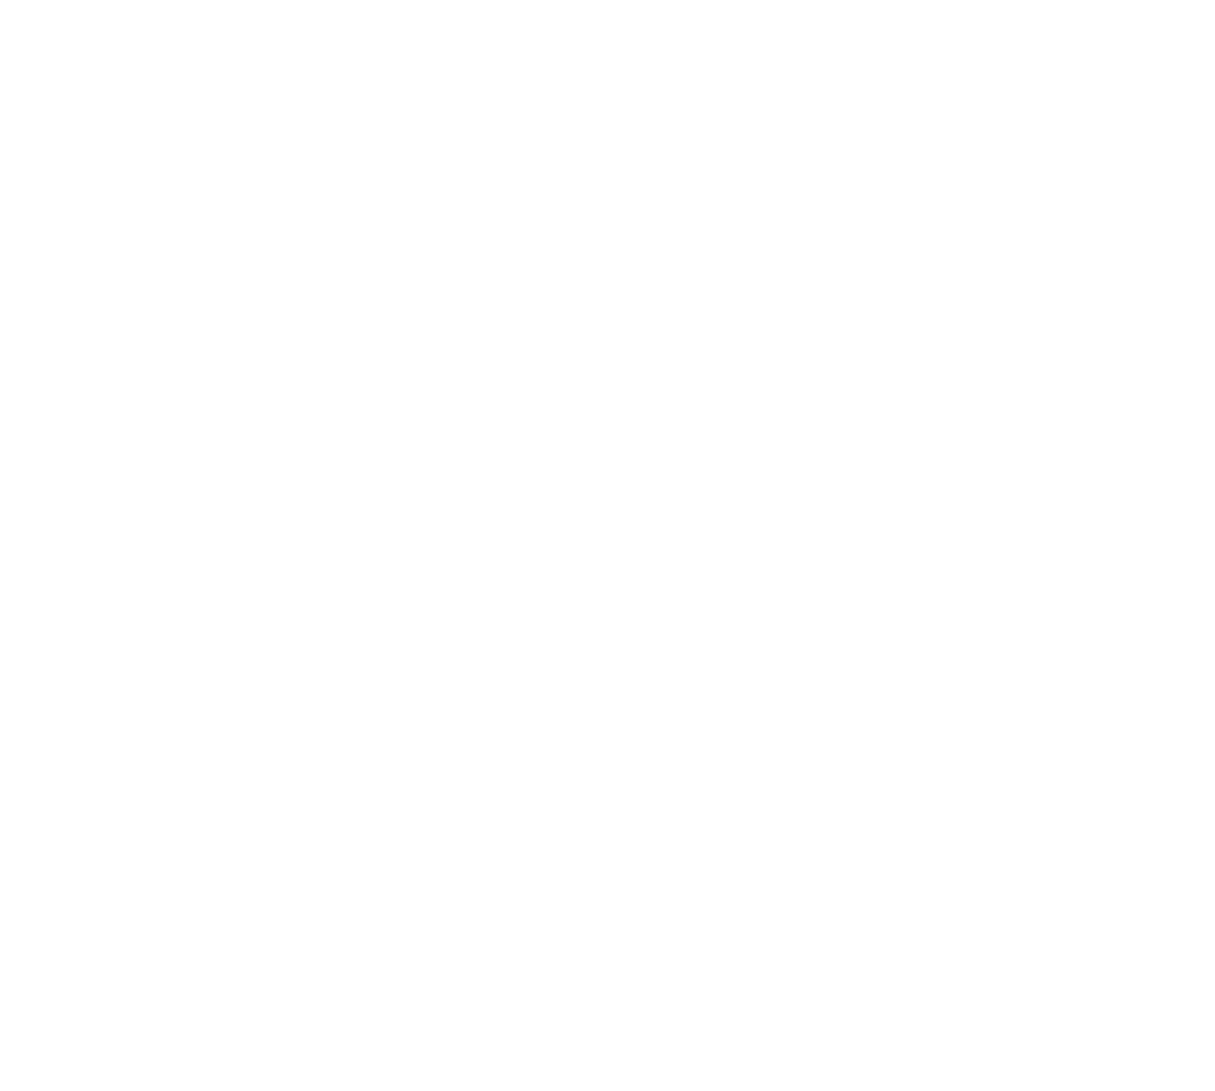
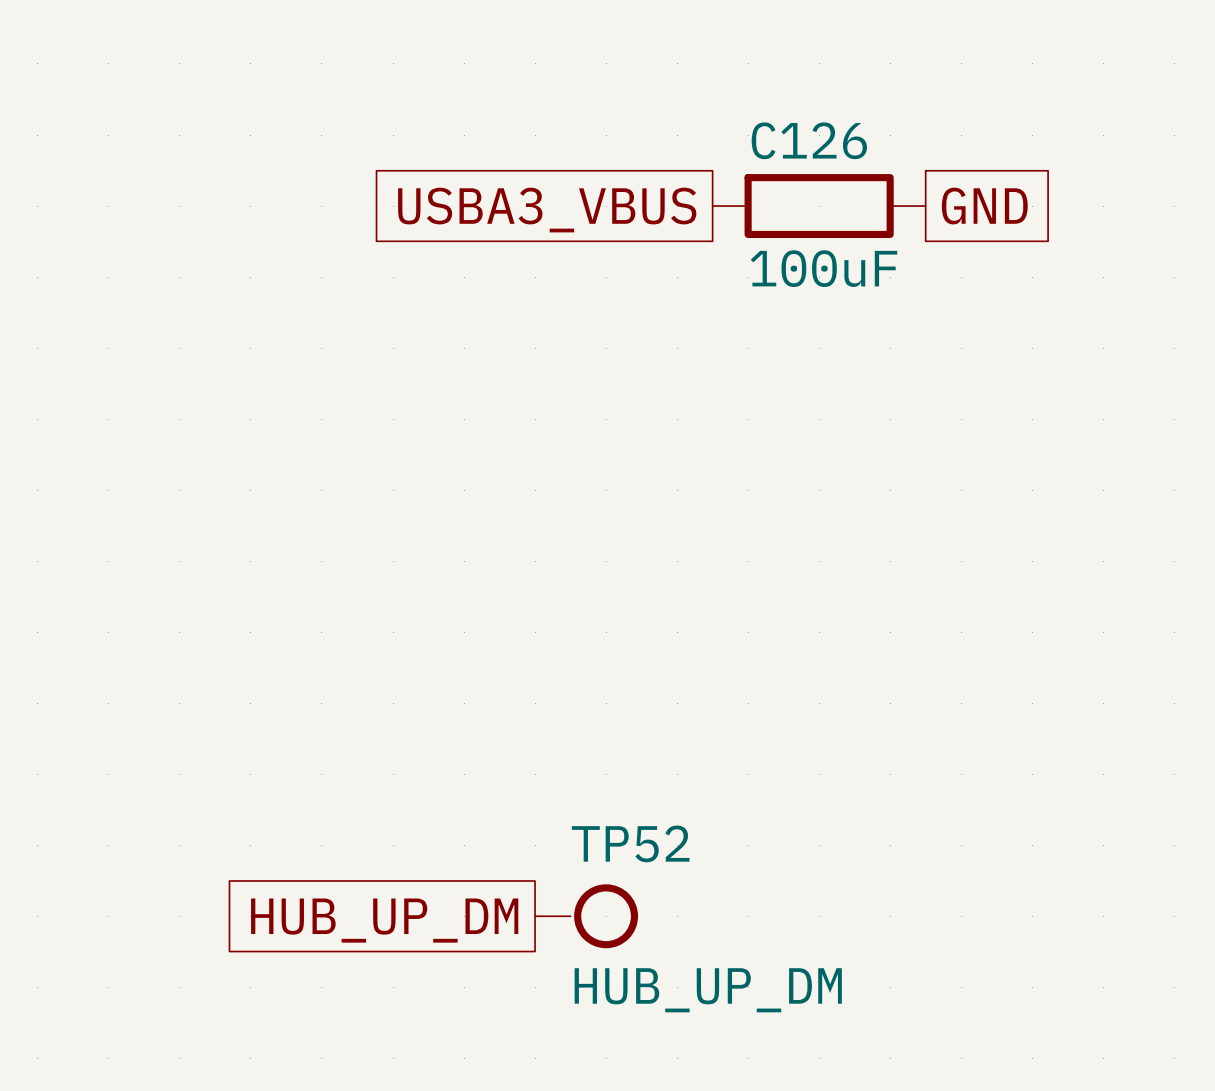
C126: none -> 100uF (819, 206)
global label: none -> GND (984, 206)
global label: none -> USBA3_VBUS (547, 210)
TP52: none -> HUB_UP_DM (586, 916)
global label: none -> HUB_UP_DM (384, 920)

